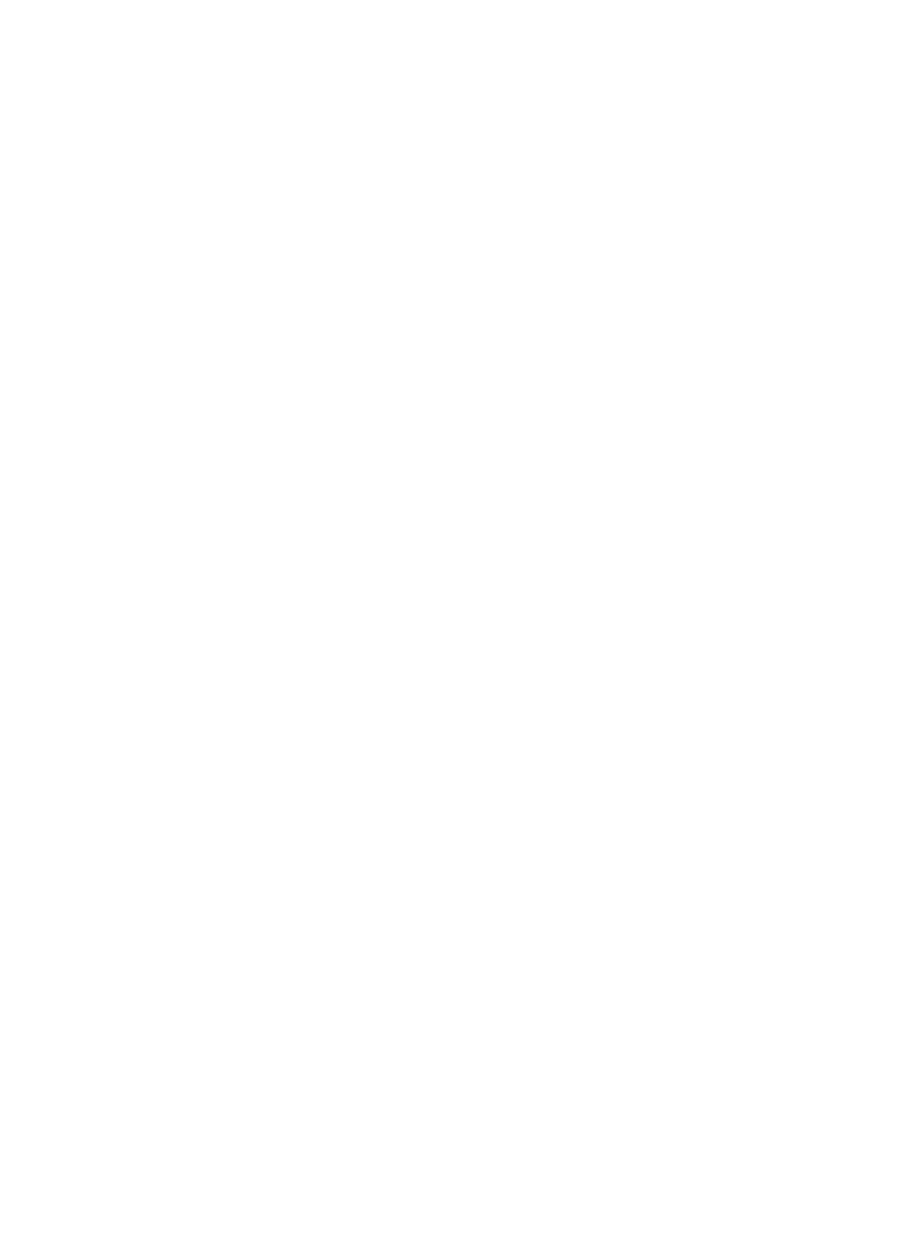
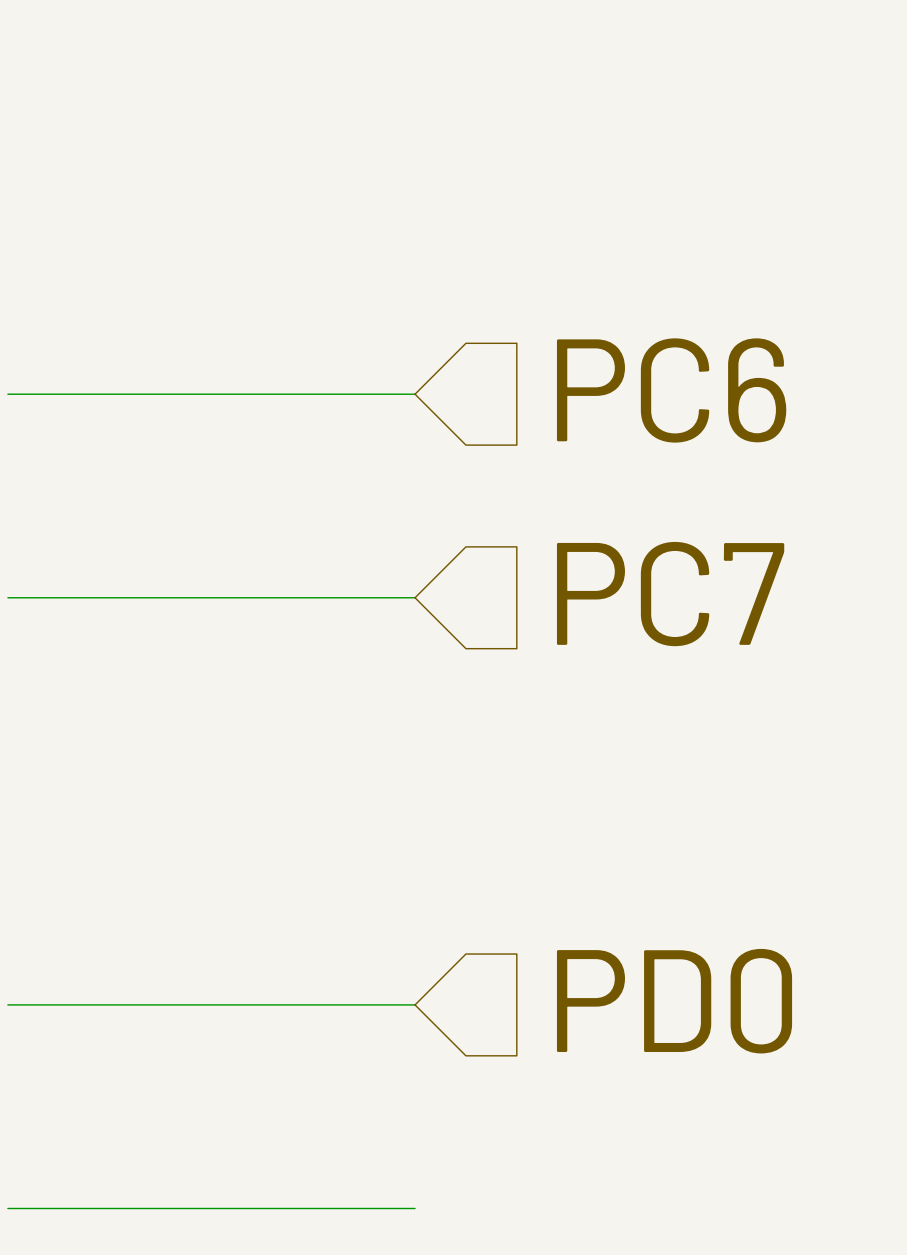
hierarchical label: none -> PC6 (671, 390)
wire: none -> (7, 394) (415, 394)
hierarchical label: none -> PC7 (670, 594)
wire: none -> (7, 597) (415, 597)
hierarchical label: none -> PD0 (674, 1001)
wire: none -> (7, 1004) (415, 1004)
wire: none -> (7, 1208) (415, 1208)

